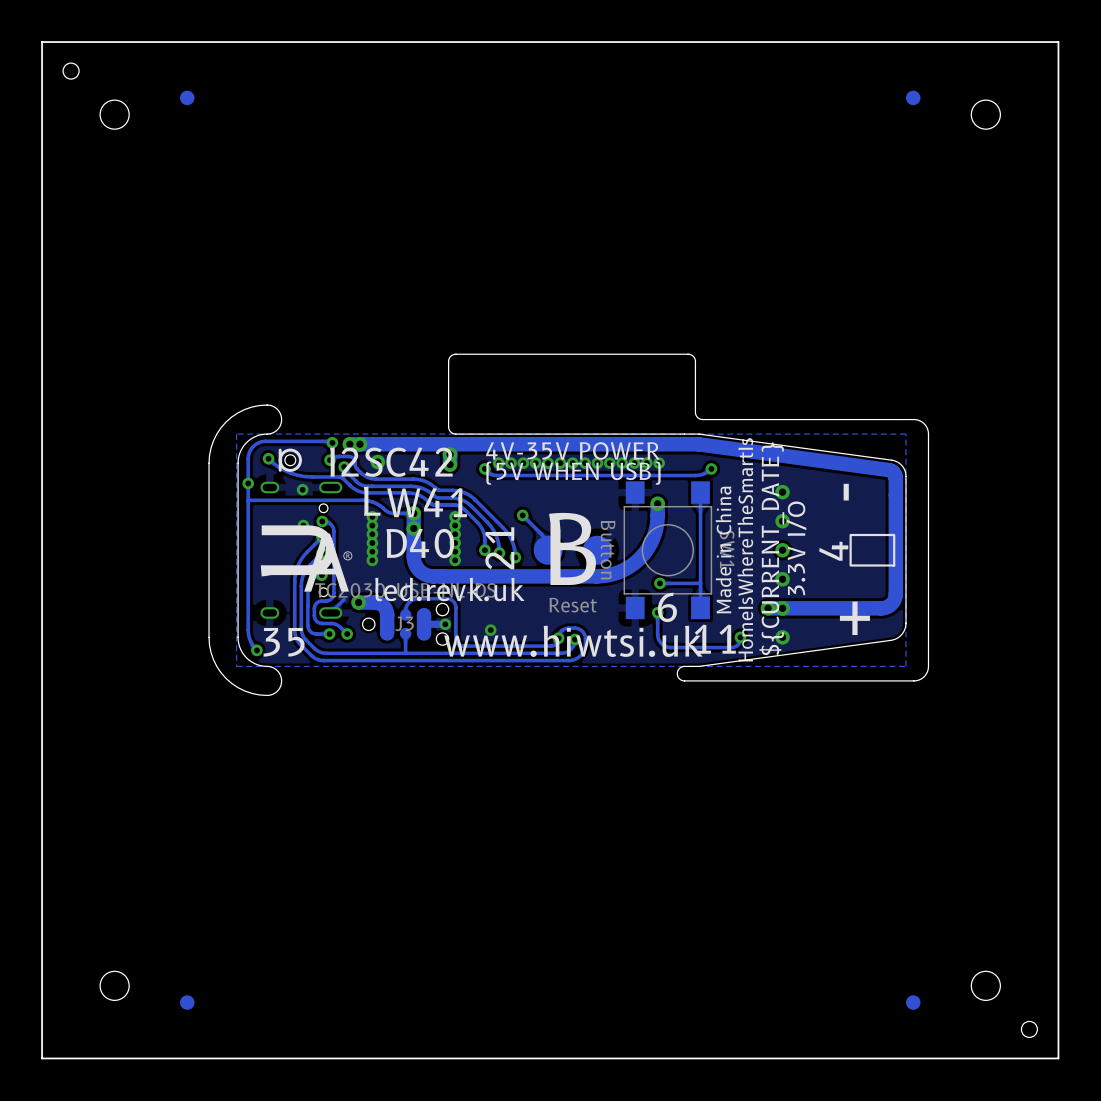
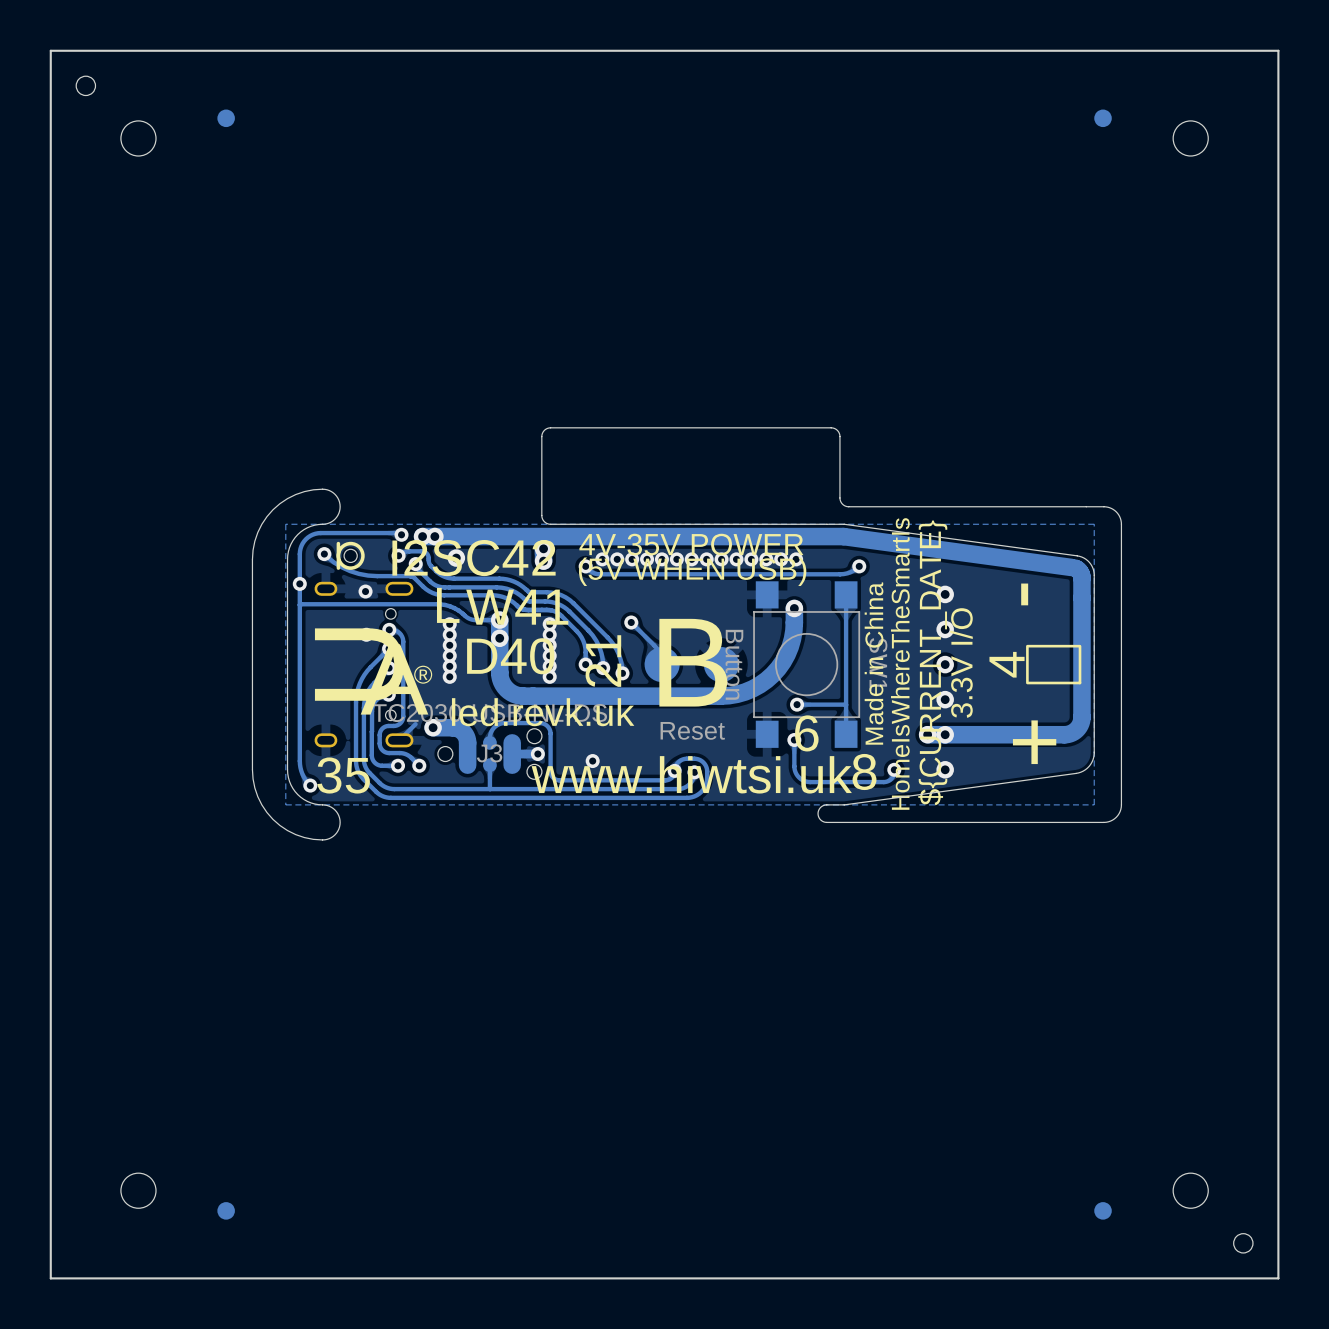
text: 11 (715, 639) -> 8 (864, 771)

